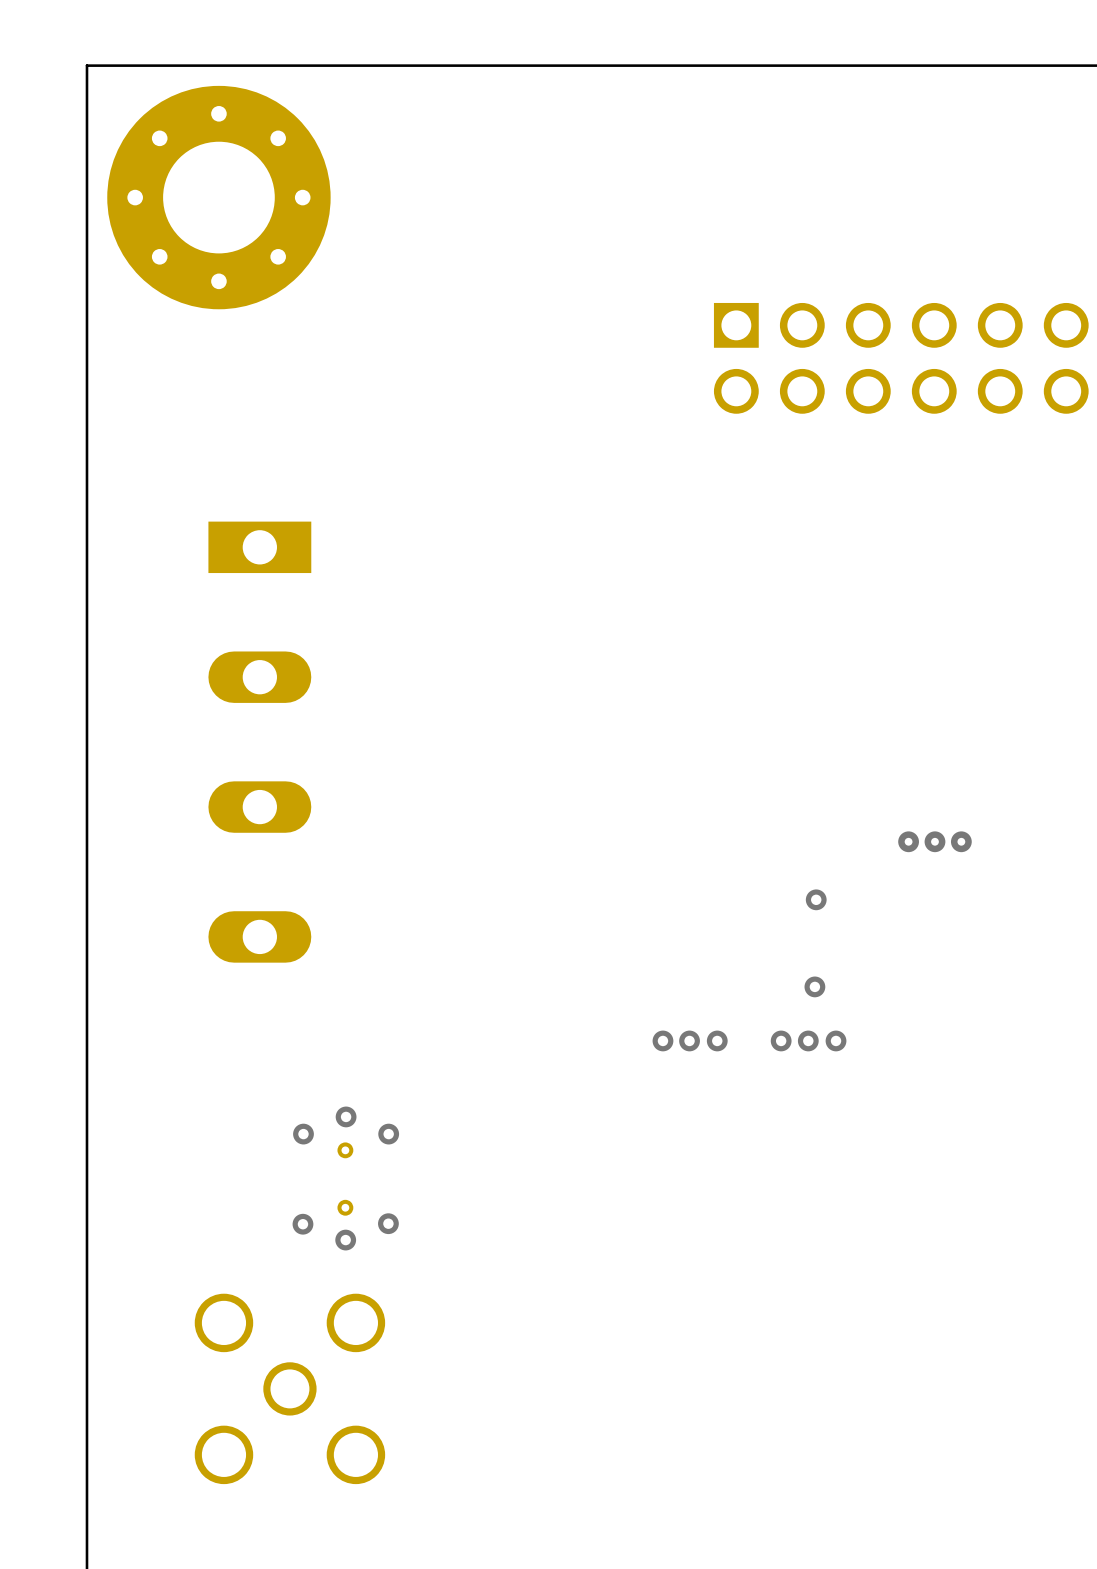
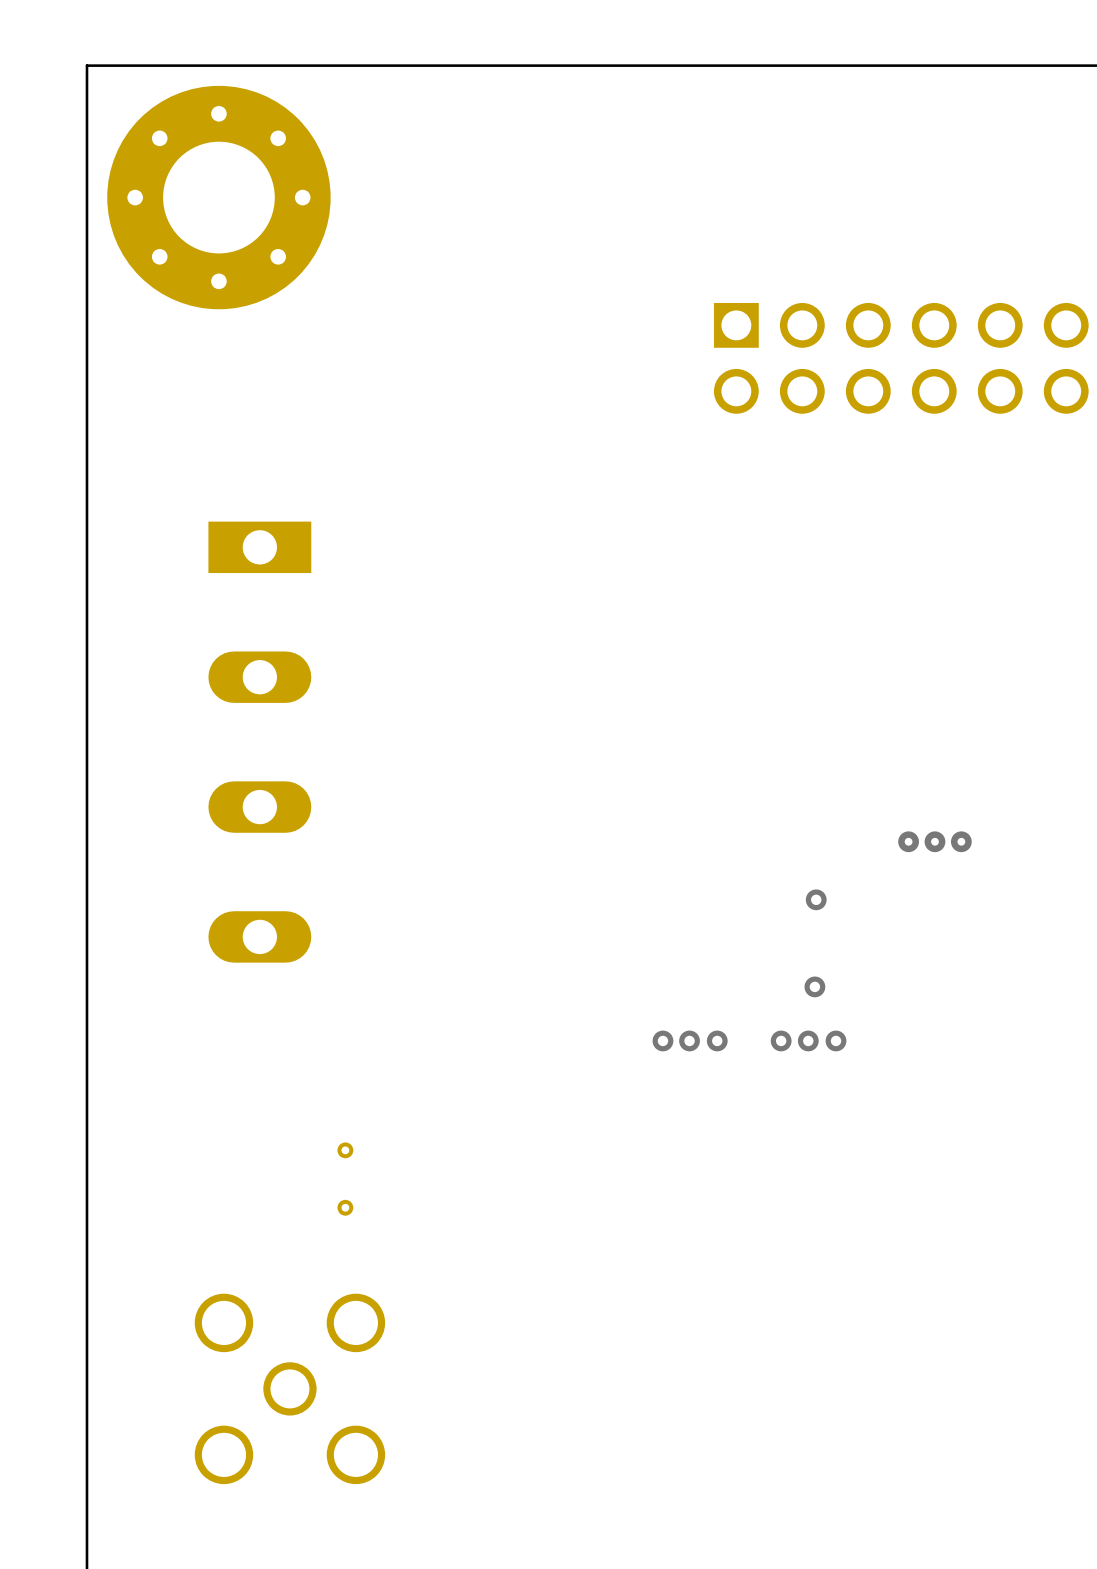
via: (346, 1116) -> none
via: (303, 1134) -> none
via: (388, 1134) -> none
via: (388, 1223) -> none
via: (302, 1224) -> none
via: (345, 1240) -> none

